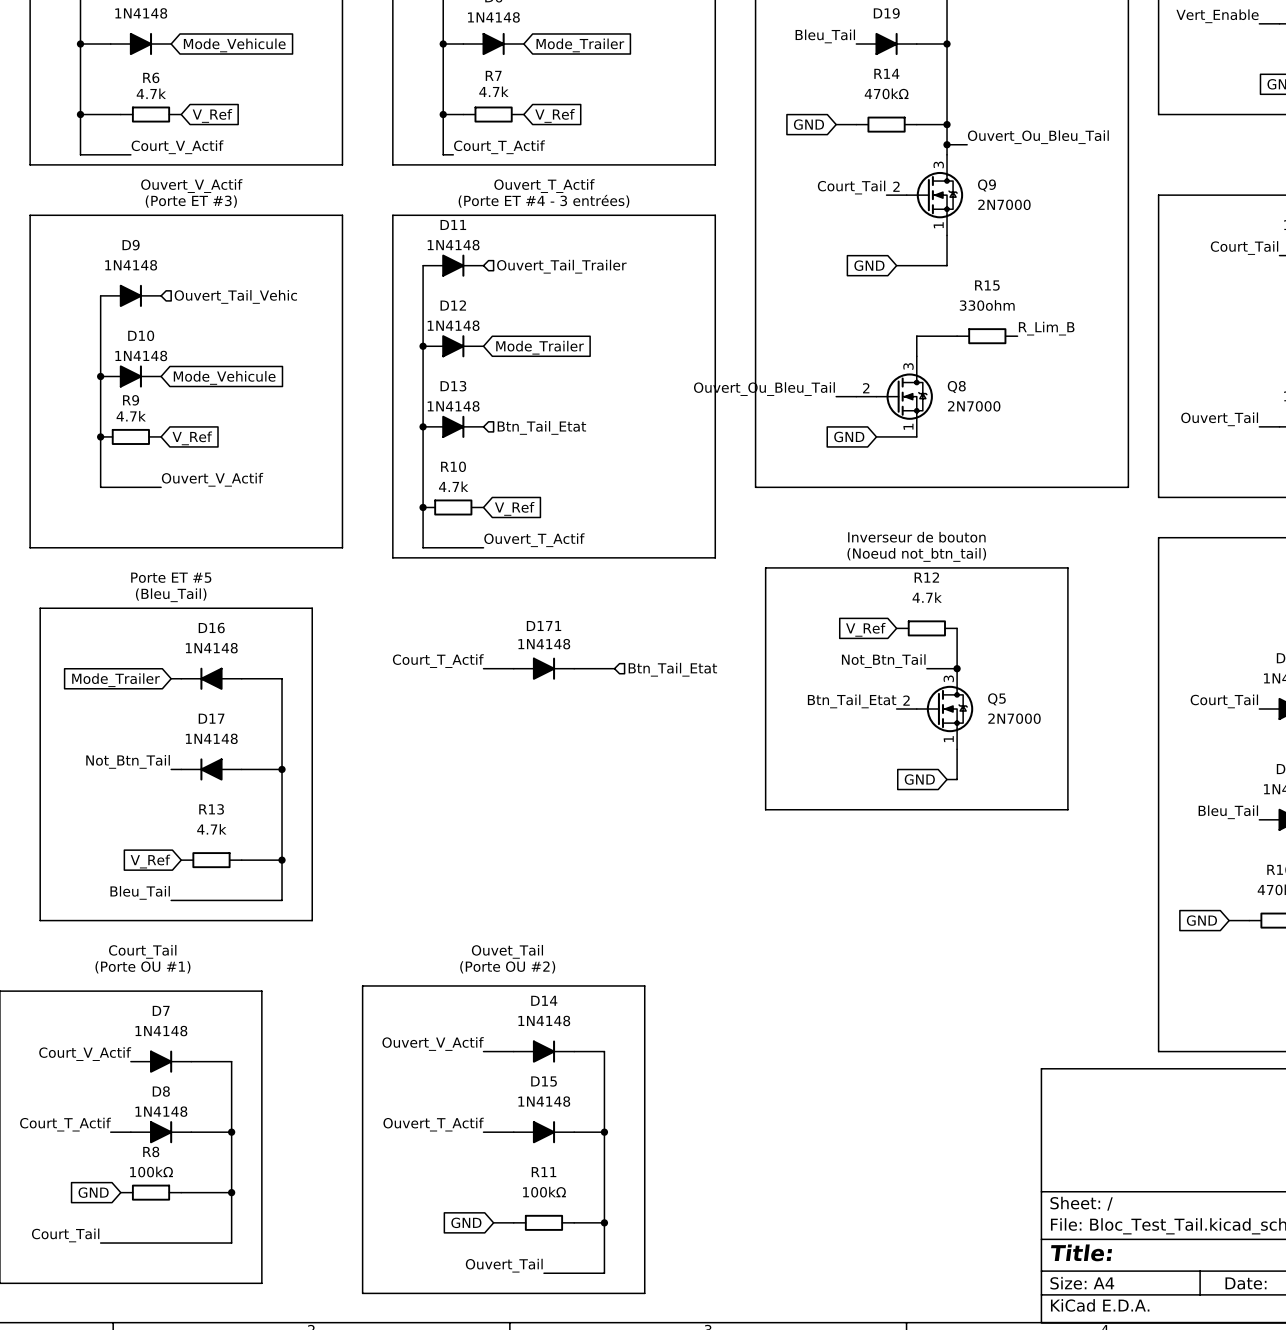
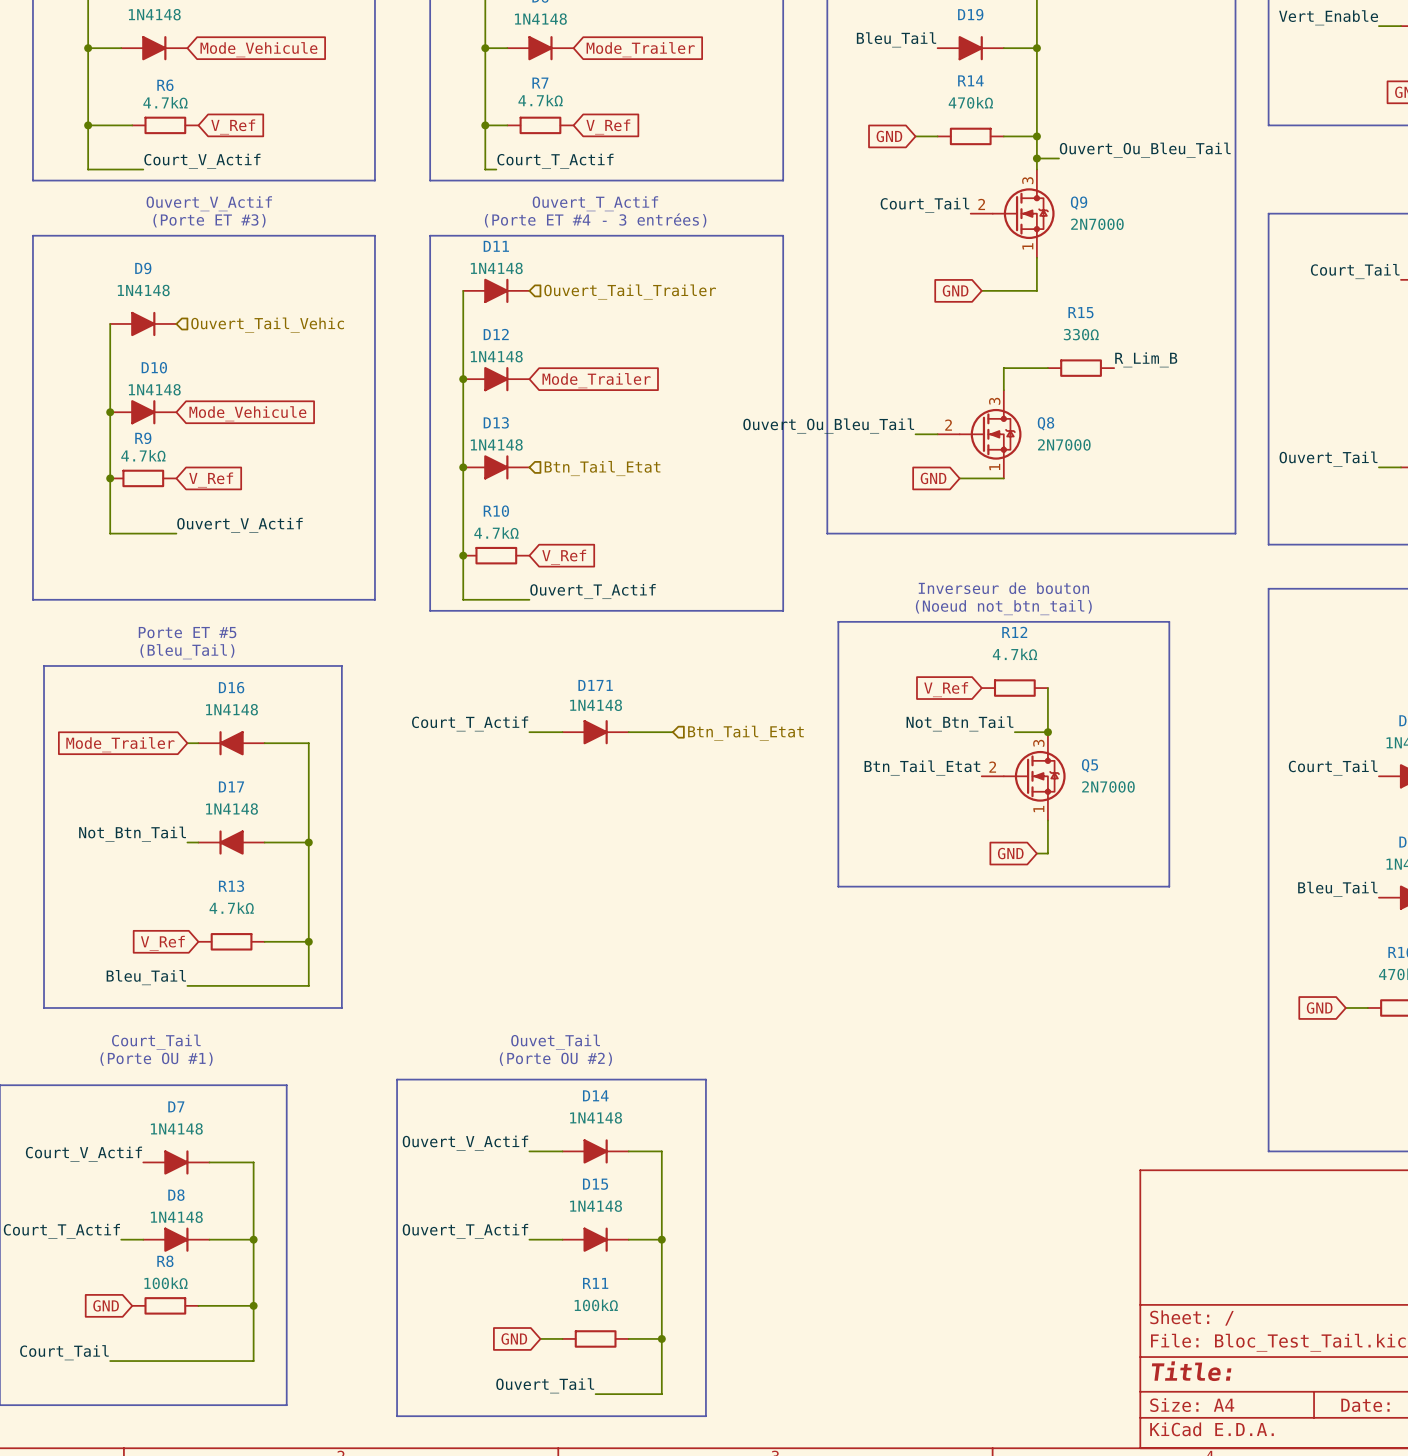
R7 value: 4.7k (493, 91) -> 4.7kΩ (540, 100)
R6 value: 4.7k (151, 93) -> 4.7kΩ (165, 102)
R15 value: 330ohm (987, 305) -> 330Ω (1081, 334)
R9 value: 4.7k (131, 416) -> 4.7kΩ (143, 455)
R10 value: 4.7k (453, 486) -> 4.7kΩ (496, 532)
R12 value: 4.7k (927, 597) -> 4.7kΩ (1014, 654)
R13 value: 4.7k (211, 829) -> 4.7kΩ (231, 908)

